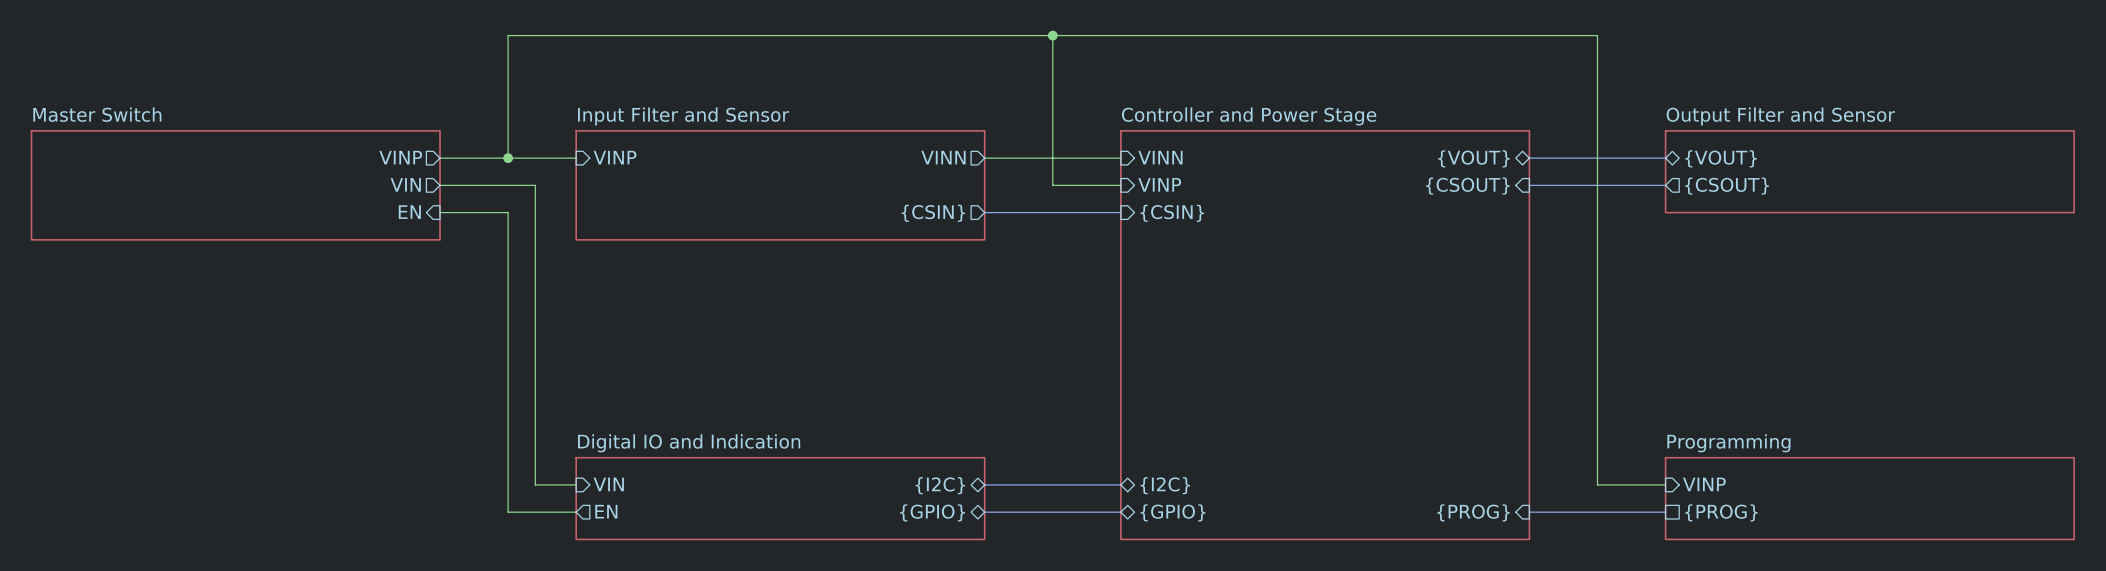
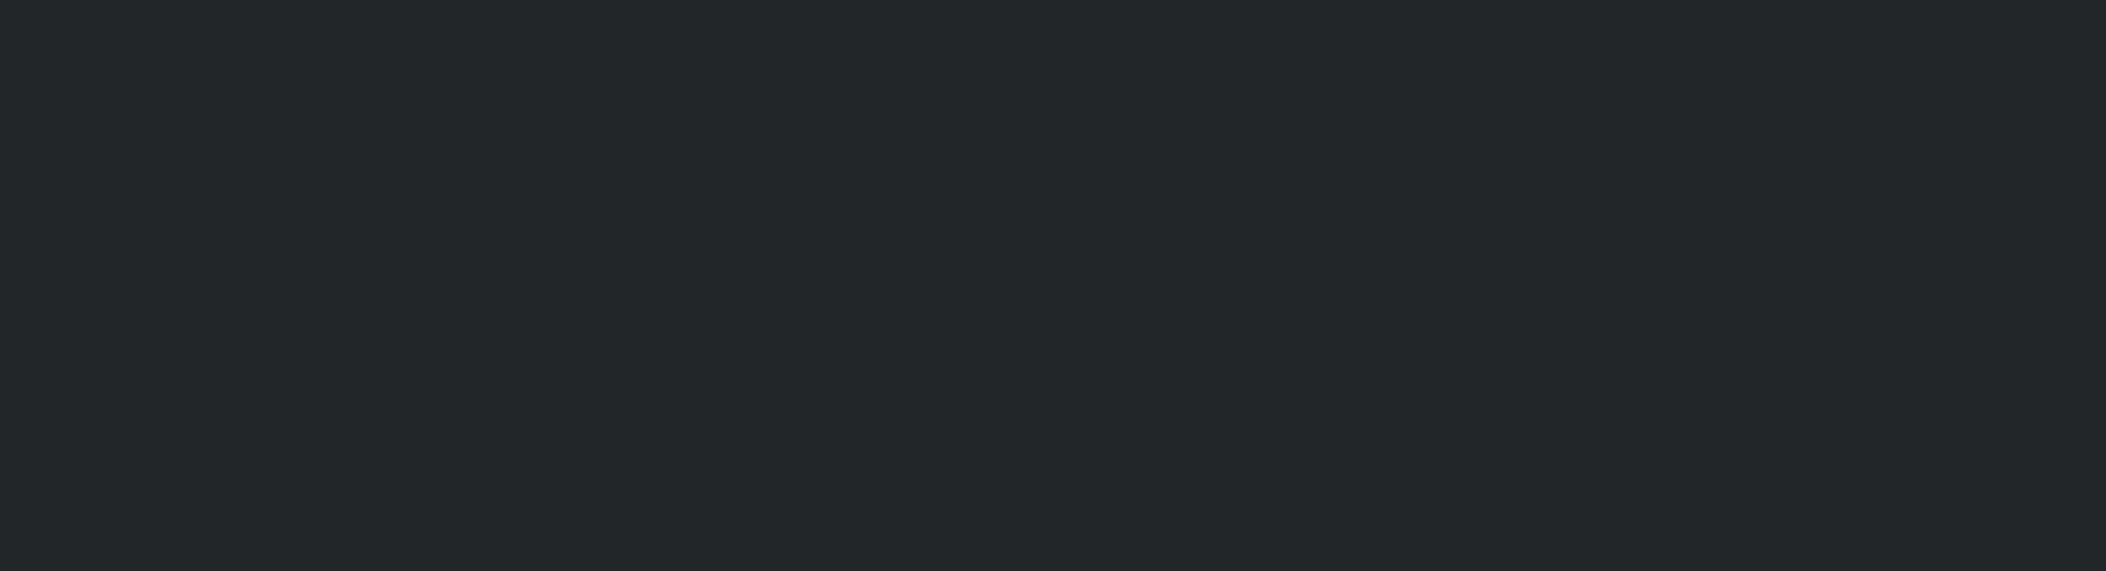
wire: (1052, 35) (1052, 185) (1120, 185) -> none
junction: (1052, 35) -> none
sheet pin: VINP (400, 157) -> none
sheet pin: VINP (614, 157) -> none
sheet pin: VINN (943, 157) -> none
sheet pin: VINN (1160, 157) -> none
wire: (440, 158) (576, 158) -> none
wire: (508, 158) (508, 35) (1597, 35) (1597, 484) (1665, 484) -> none
junction: (508, 158) -> none
wire: (984, 158) (1120, 158) -> none
sheet pin: {VOUT} (1473, 158) -> none
bus: (1529, 158) (1665, 158) -> none
sheet pin: {VOUT} (1721, 158) -> none
sheet Output Filter and Sensor: (1869, 171) -> none
sheet pin: VIN (405, 184) -> none
sheet pin: VINP (1159, 184) -> none
sheet Master Switch: (235, 185) -> none
wire: (440, 185) (535, 185) (535, 484) (576, 484) -> none
sheet Input Filter and Sensor: (780, 185) -> none
bus: (1529, 185) (1665, 185) -> none
sheet pin: {CSOUT} (1467, 186) -> none
sheet pin: {CSOUT} (1727, 186) -> none
sheet pin: EN (409, 212) -> none
wire: (440, 212) (508, 212) (508, 512) (576, 512) -> none
bus: (984, 212) (1120, 212) -> none
sheet pin: {CSIN} (933, 213) -> none
sheet pin: {CSIN} (1172, 213) -> none
sheet Controller and Power Stage: (1325, 335) -> none
sheet pin: VIN (608, 484) -> none
bus: (984, 484) (1120, 484) -> none
sheet pin: VINP (1704, 484) -> none
sheet pin: {I2C} (940, 485) -> none
sheet pin: {I2C} (1165, 485) -> none
sheet Digital IO and Indication: (780, 498) -> none
sheet Programming: (1869, 498) -> none
sheet pin: EN (606, 511) -> none
sheet pin: {GPIO} (932, 512) -> none
bus: (984, 512) (1120, 512) -> none
sheet pin: {GPIO} (1173, 512) -> none
sheet pin: {PROG} (1473, 512) -> none
bus: (1529, 512) (1665, 512) -> none
sheet pin: {PROG} (1721, 512) -> none

